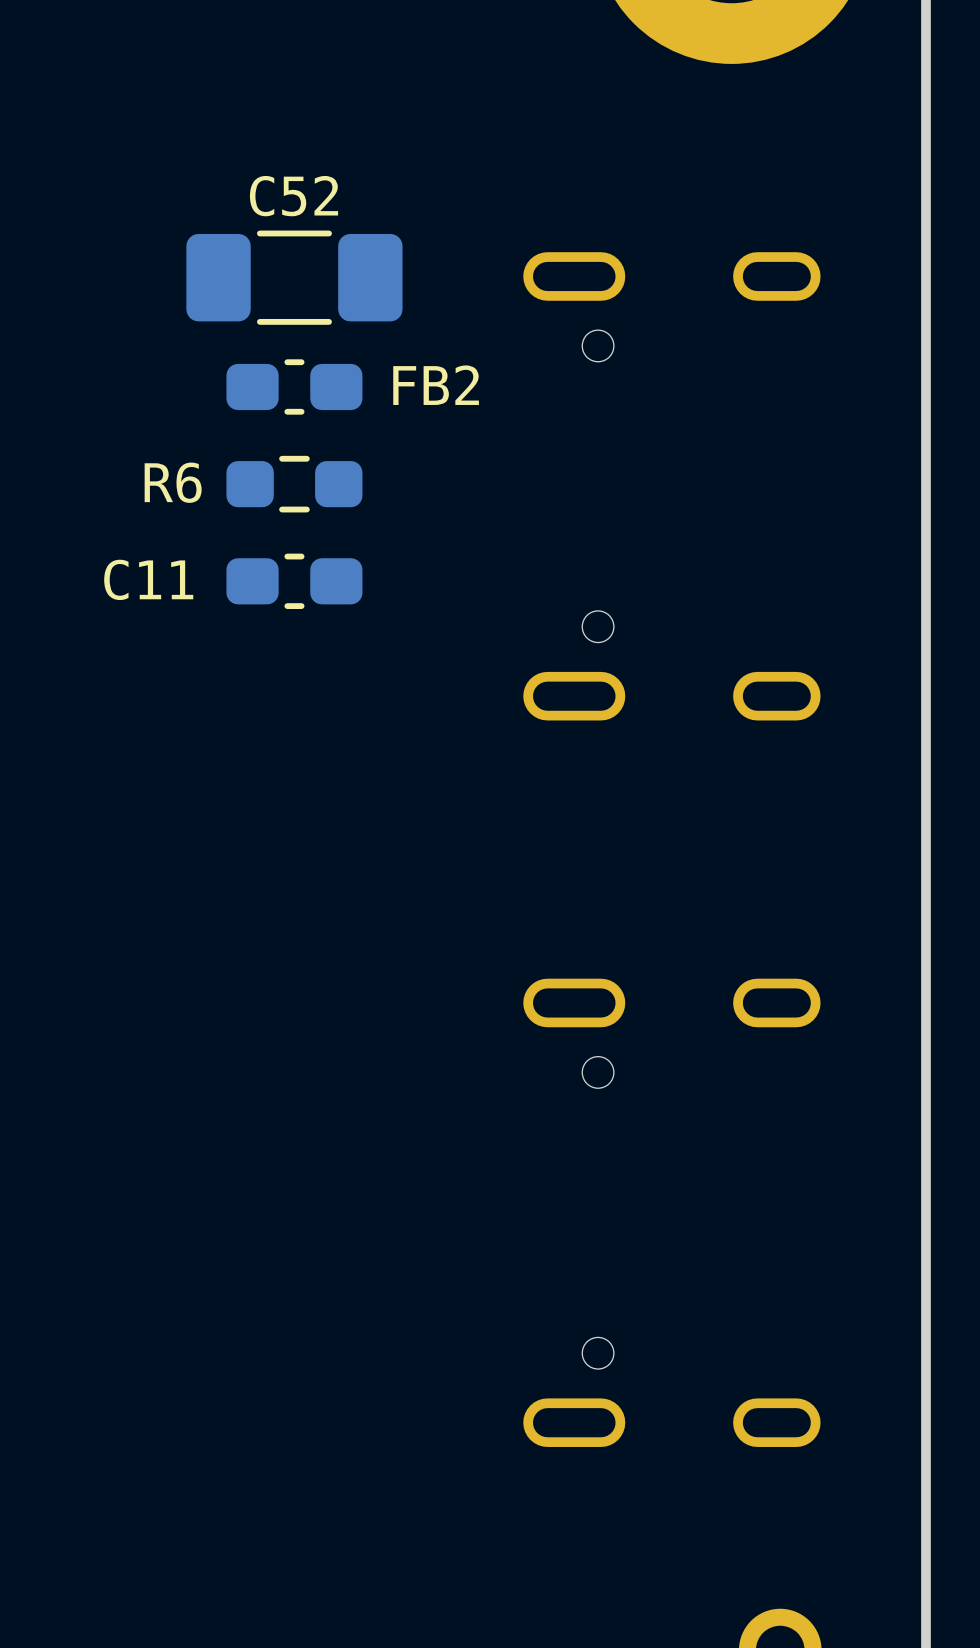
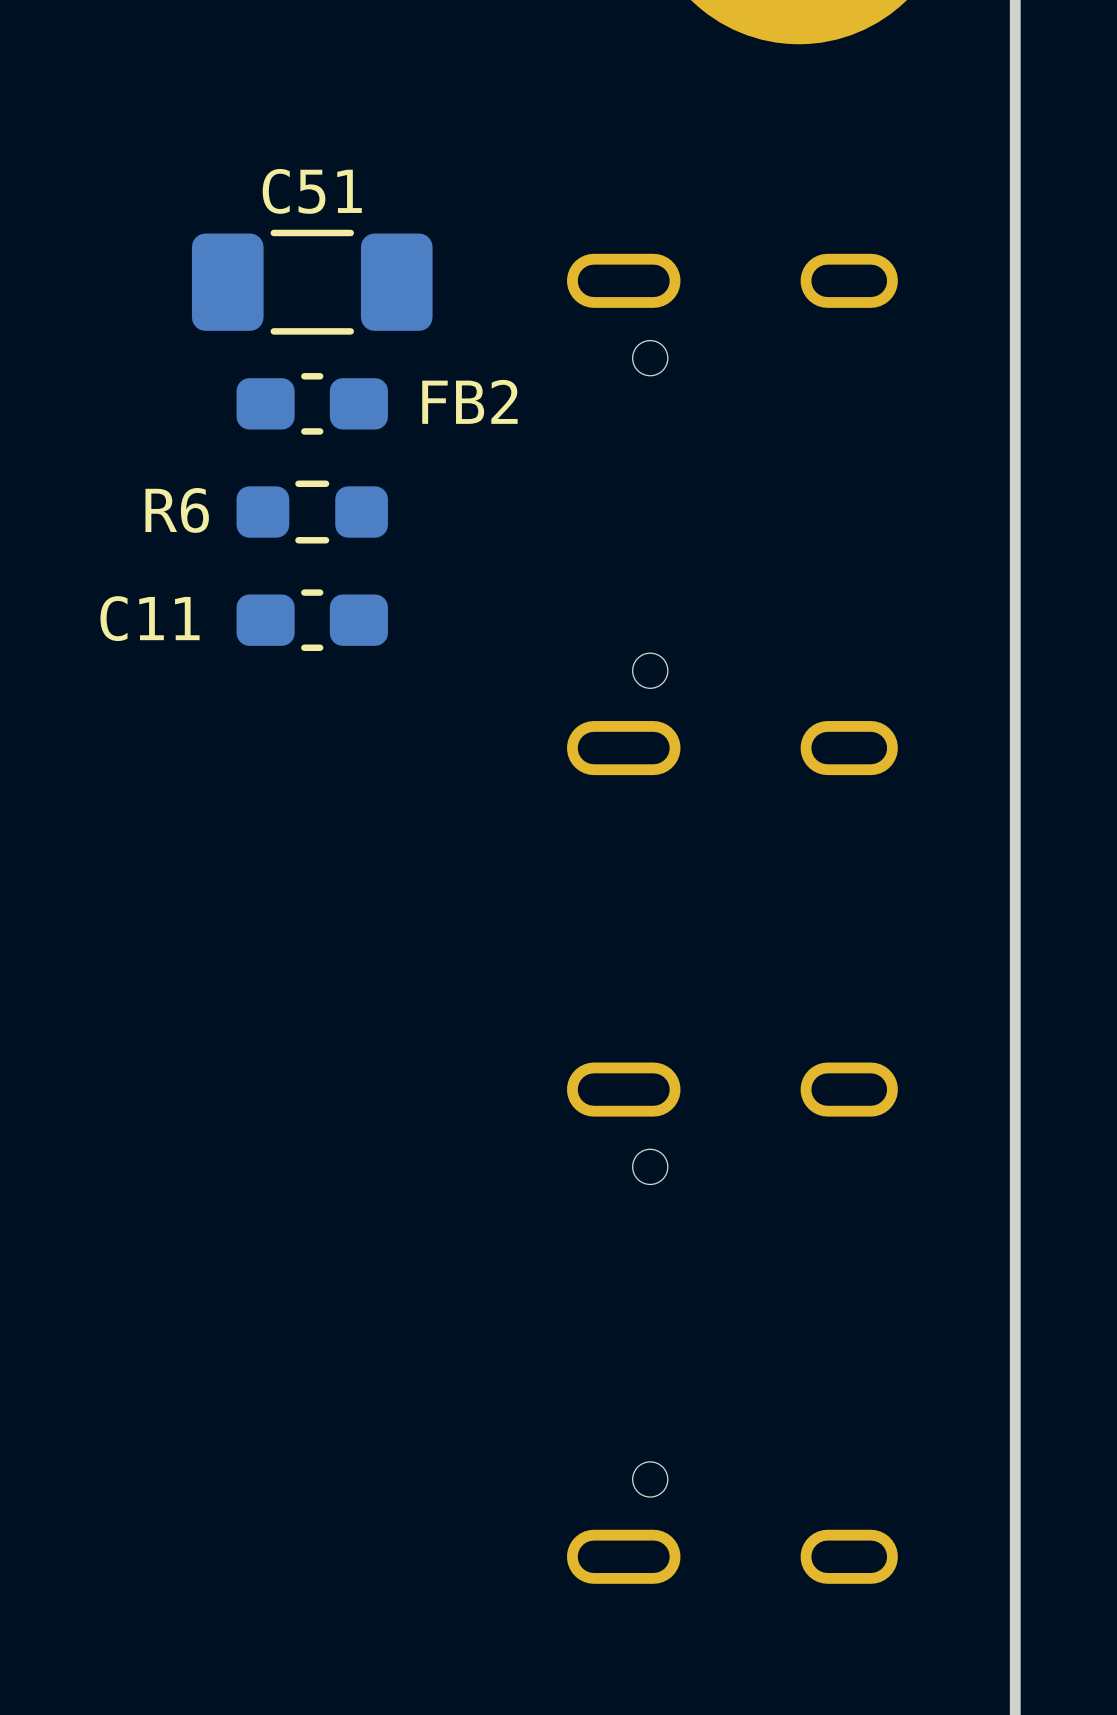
C52 name: C52 (294, 196) -> C51 (312, 191)

